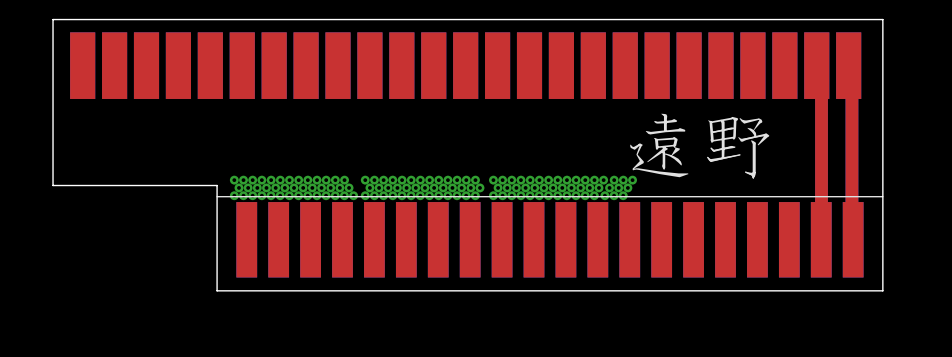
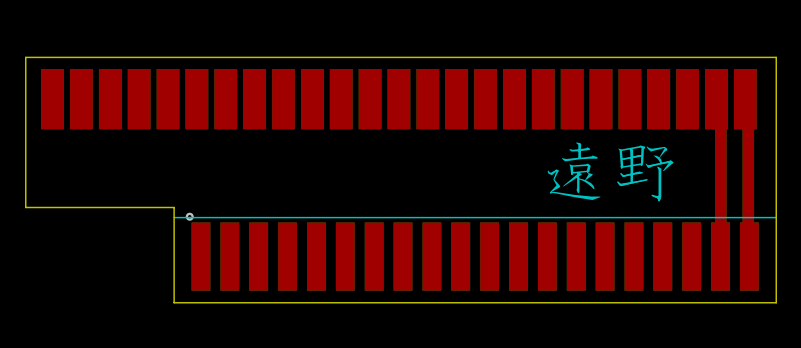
via: (234, 180) -> none
via: (243, 180) -> none
via: (252, 180) -> none
via: (261, 180) -> none
via: (271, 180) -> none
via: (280, 180) -> none
via: (289, 180) -> none
via: (298, 180) -> none
via: (307, 180) -> none
via: (317, 180) -> none
via: (326, 180) -> none
via: (335, 180) -> none
via: (344, 180) -> none
via: (365, 180) -> none
via: (374, 180) -> none
via: (383, 180) -> none
via: (392, 180) -> none
via: (402, 180) -> none
via: (411, 180) -> none
via: (420, 180) -> none
via: (429, 180) -> none
via: (438, 180) -> none
via: (447, 180) -> none
via: (457, 180) -> none
via: (466, 180) -> none
via: (475, 180) -> none
via: (493, 180) -> none
via: (502, 180) -> none
via: (511, 180) -> none
via: (520, 180) -> none
via: (530, 180) -> none
via: (539, 180) -> none
via: (548, 180) -> none
via: (557, 180) -> none
via: (566, 180) -> none
via: (576, 180) -> none
via: (585, 180) -> none
via: (594, 180) -> none
via: (603, 180) -> none
via: (614, 180) -> none
via: (623, 180) -> none
via: (632, 180) -> none
via: (238, 187) -> none
via: (248, 187) -> none
via: (257, 187) -> none
via: (266, 187) -> none
via: (275, 187) -> none
via: (284, 187) -> none
via: (294, 187) -> none
via: (303, 187) -> none
via: (312, 187) -> none
via: (321, 187) -> none
via: (330, 187) -> none
via: (339, 187) -> none
via: (349, 187) -> none
via: (369, 187) -> none
via: (379, 187) -> none
via: (388, 187) -> none
via: (397, 187) -> none
via: (406, 187) -> none
via: (415, 187) -> none
via: (424, 187) -> none
via: (434, 187) -> none
via: (443, 187) -> none
via: (452, 187) -> none
via: (461, 187) -> none
via: (470, 187) -> none
via: (480, 187) -> none
via: (498, 187) -> none
via: (507, 187) -> none
via: (516, 187) -> none
via: (525, 187) -> none
via: (534, 187) -> none
via: (543, 187) -> none
via: (553, 187) -> none
via: (562, 187) -> none
via: (571, 187) -> none
via: (580, 187) -> none
via: (589, 187) -> none
via: (598, 187) -> none
via: (609, 187) -> none
via: (618, 187) -> none
via: (627, 187) -> none
via: (243, 195) -> none
via: (252, 195) -> none
via: (261, 195) -> none
via: (271, 195) -> none
via: (280, 195) -> none
via: (289, 195) -> none
via: (298, 195) -> none
via: (307, 195) -> none
via: (316, 195) -> none
via: (326, 195) -> none
via: (335, 195) -> none
via: (344, 195) -> none
via: (353, 195) -> none
via: (365, 195) -> none
via: (374, 195) -> none
via: (383, 195) -> none
via: (392, 195) -> none
via: (401, 195) -> none
via: (411, 195) -> none
via: (420, 195) -> none
via: (429, 195) -> none
via: (438, 195) -> none
via: (447, 195) -> none
via: (457, 195) -> none
via: (466, 195) -> none
via: (475, 195) -> none
via: (493, 195) -> none
via: (502, 195) -> none
via: (511, 195) -> none
via: (520, 195) -> none
via: (530, 195) -> none
via: (539, 195) -> none
via: (548, 195) -> none
via: (557, 195) -> none
via: (566, 195) -> none
via: (576, 195) -> none
via: (585, 195) -> none
via: (594, 195) -> none
via: (604, 195) -> none
via: (614, 195) -> none
via: (623, 195) -> none

